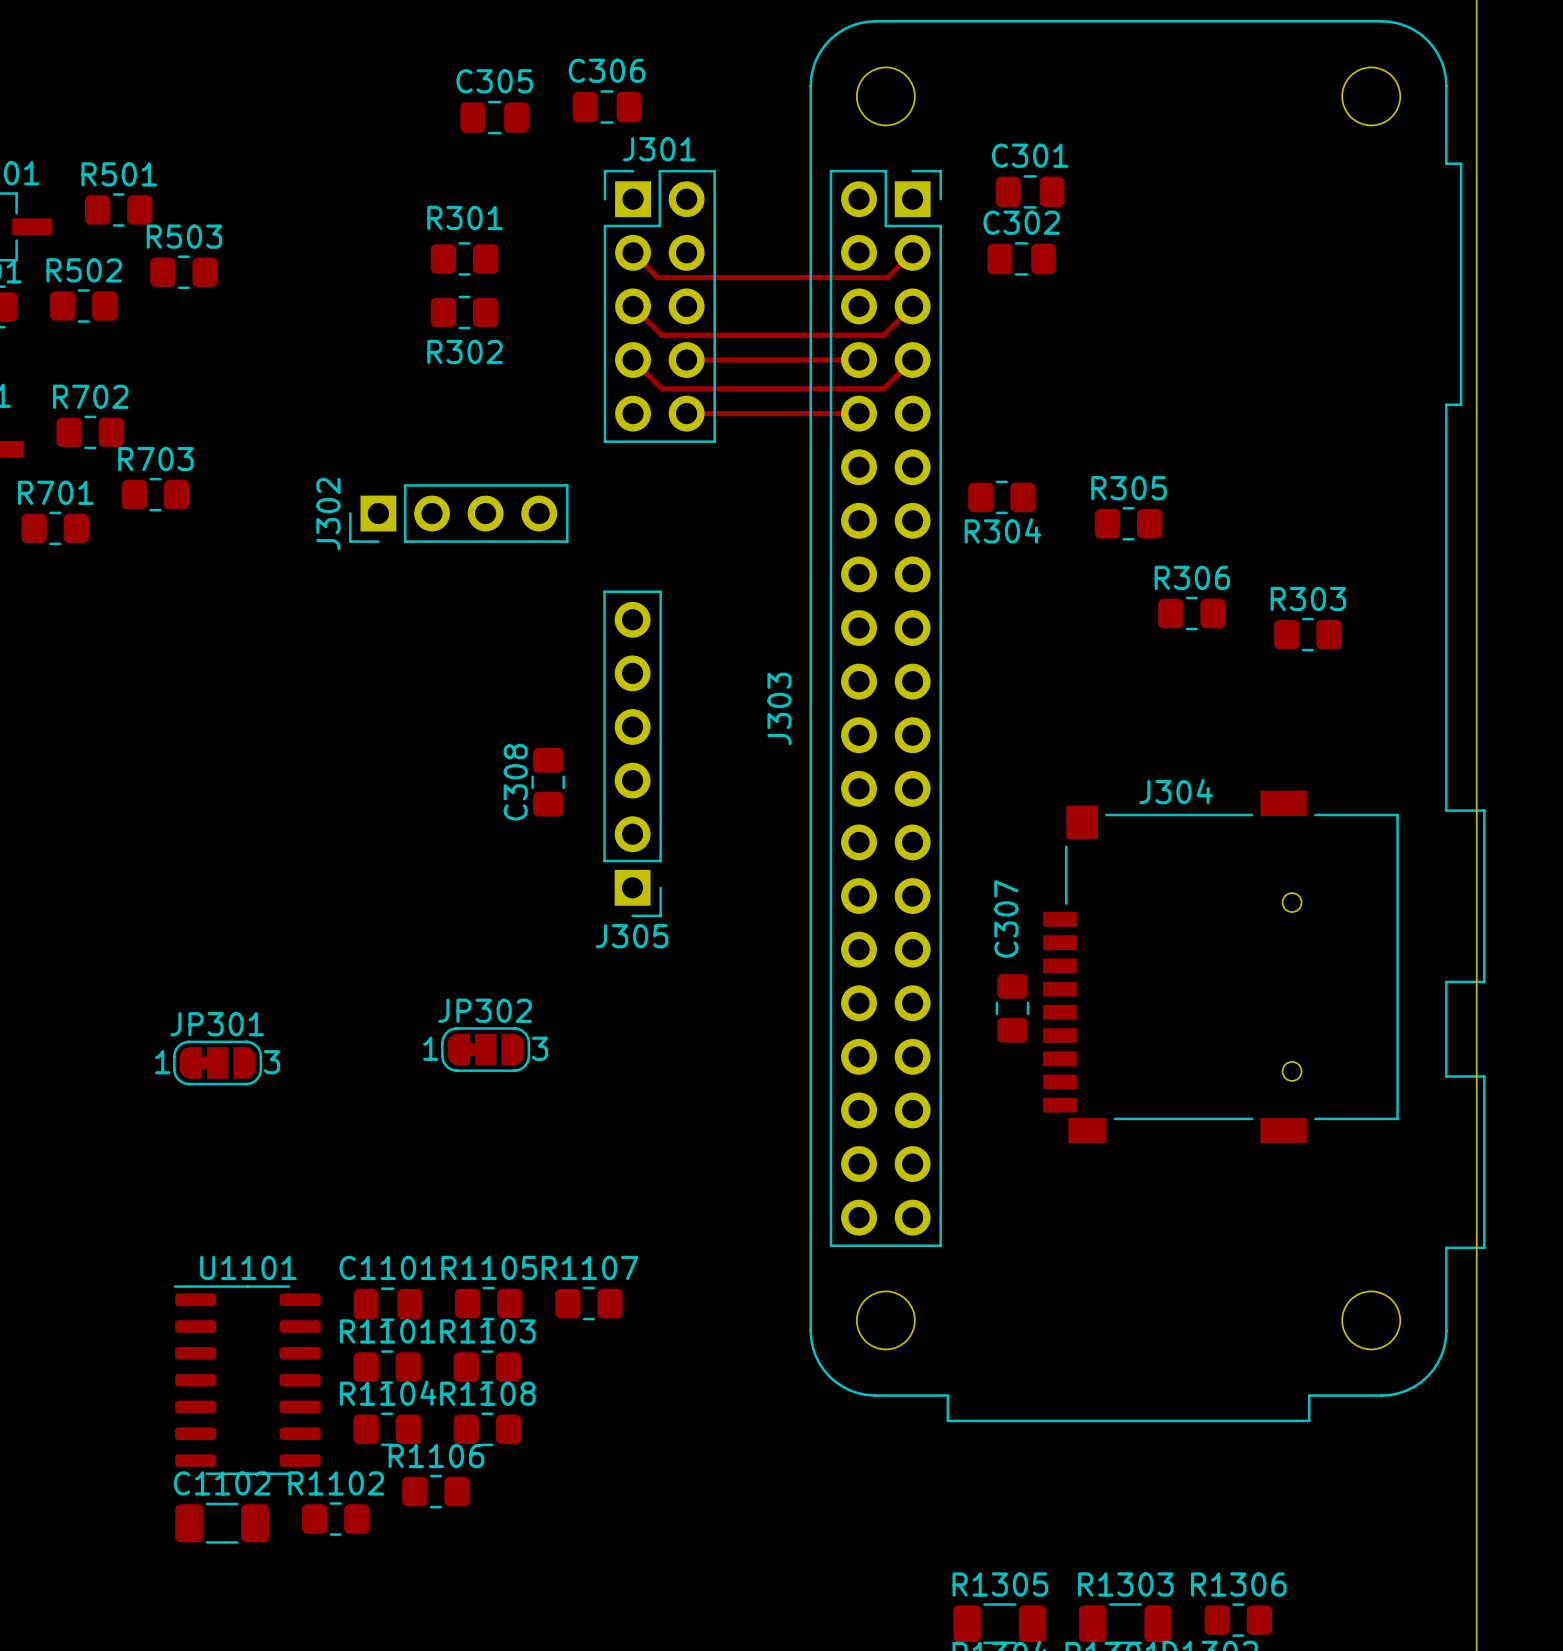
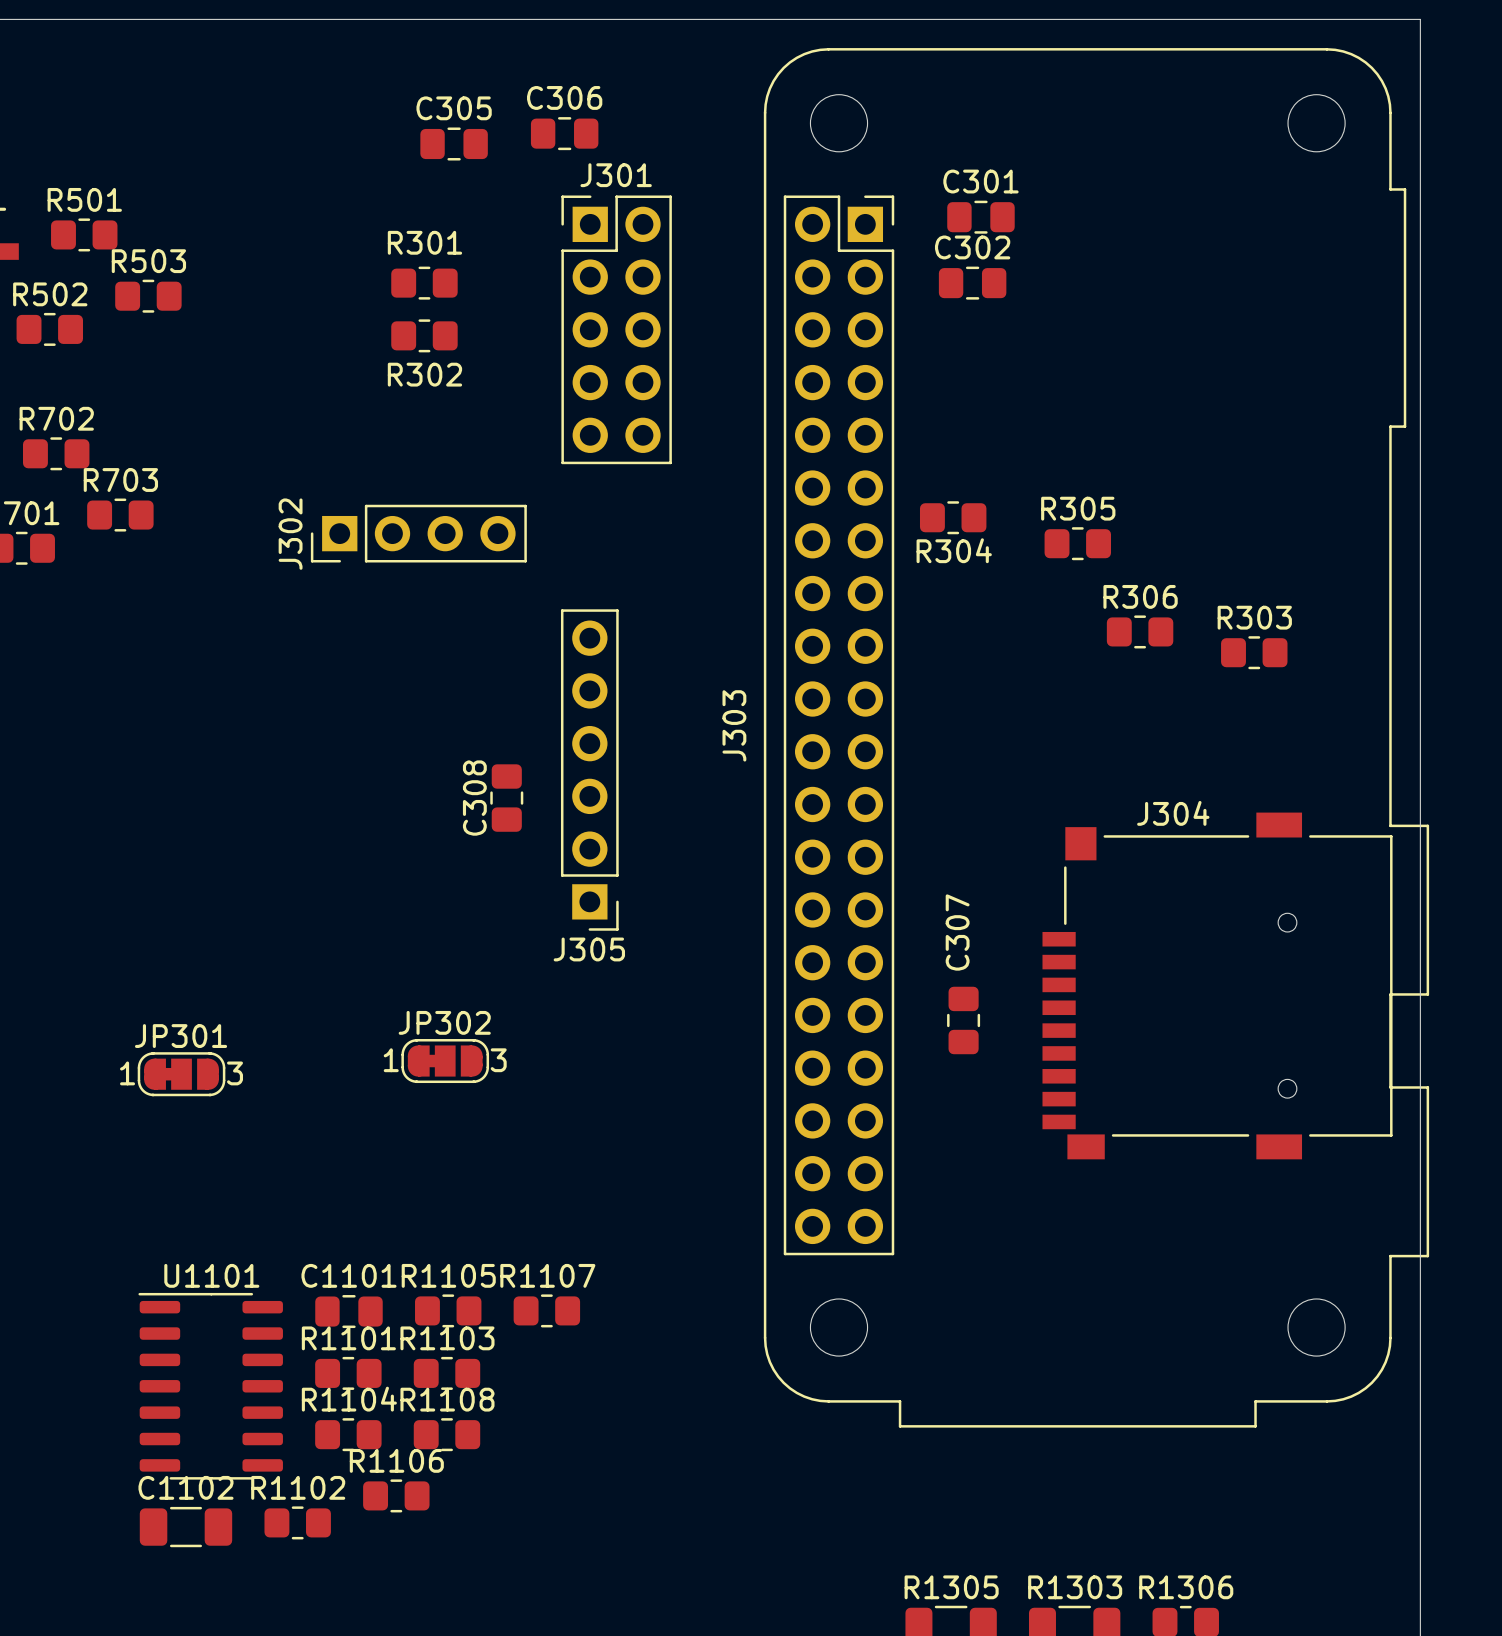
top track: (633, 252) (657, 277) (887, 277) (912, 252) -> none
top track: (633, 306) (661, 335) (883, 335) (912, 306) -> none
top track: (633, 360) (661, 388) (883, 388) (912, 360) -> none
top track: (686, 360) (859, 360) -> none
top track: (686, 413) (859, 413) -> none
J304 position: (1220, 966) -> (1217, 985)

